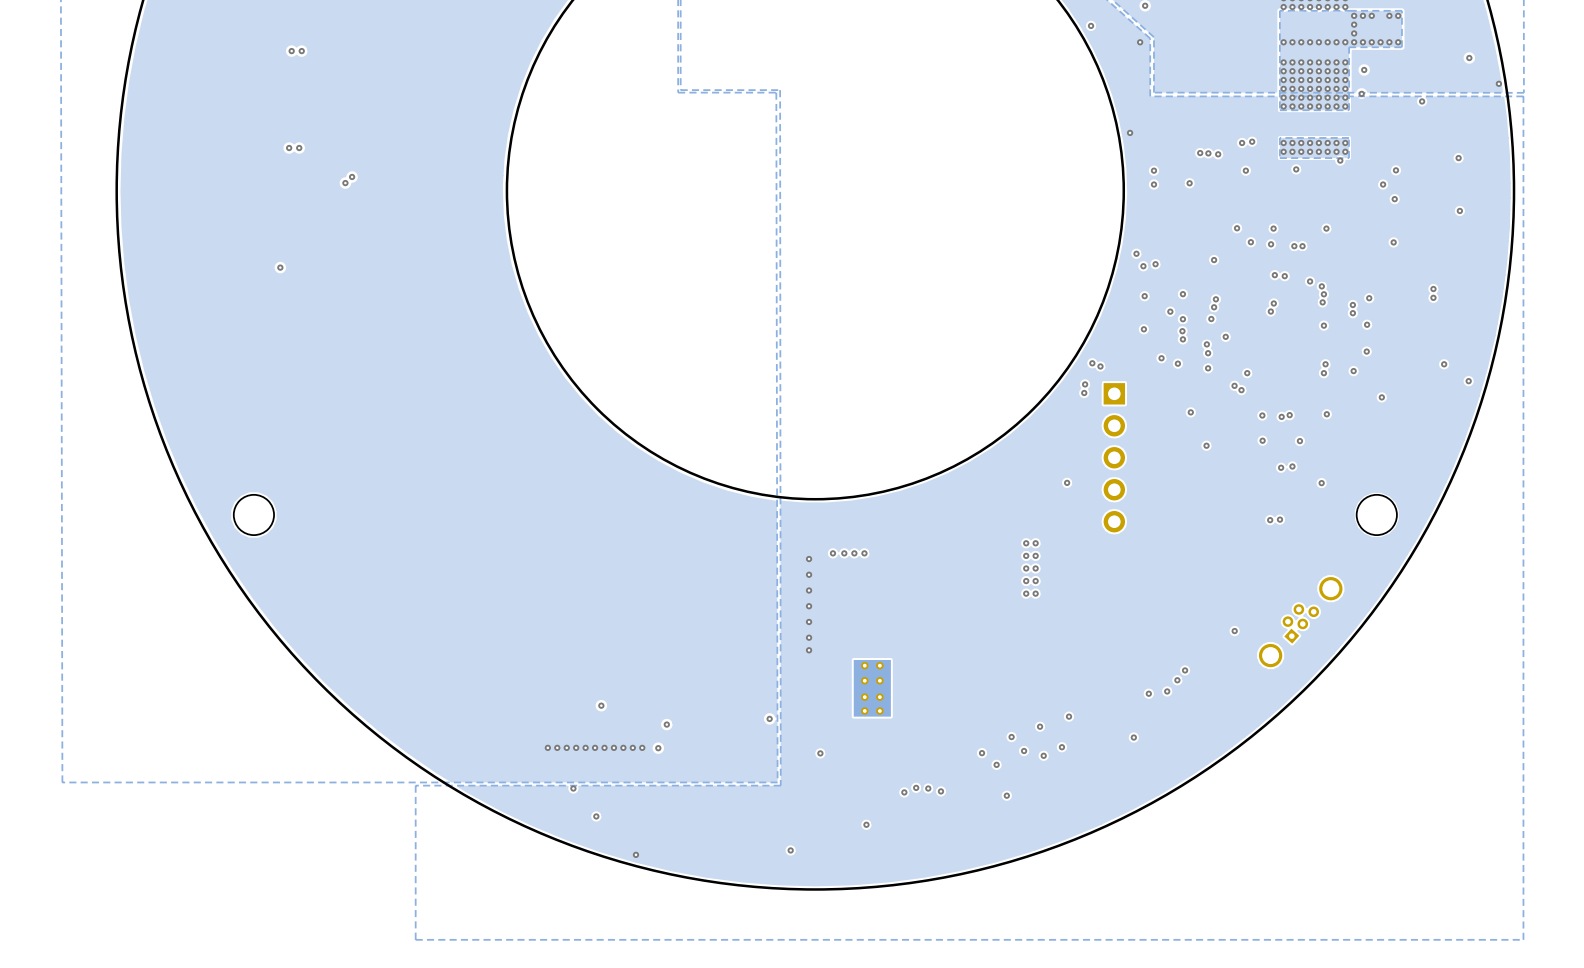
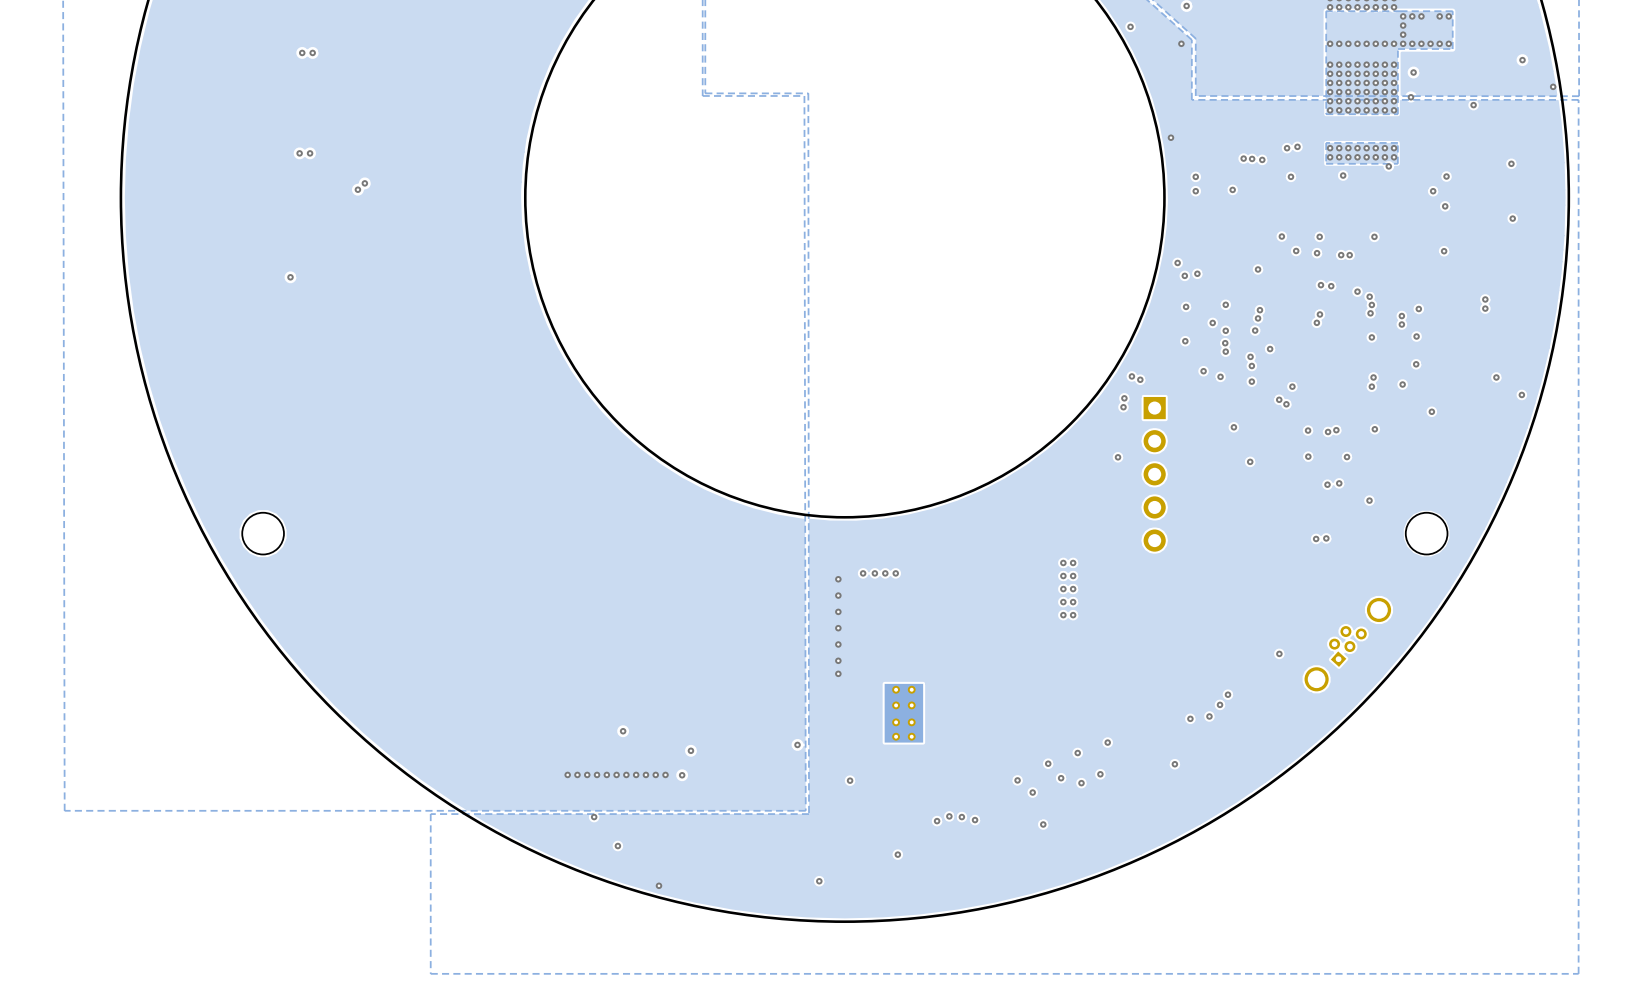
via position: (1067, 482) -> (1118, 457)

